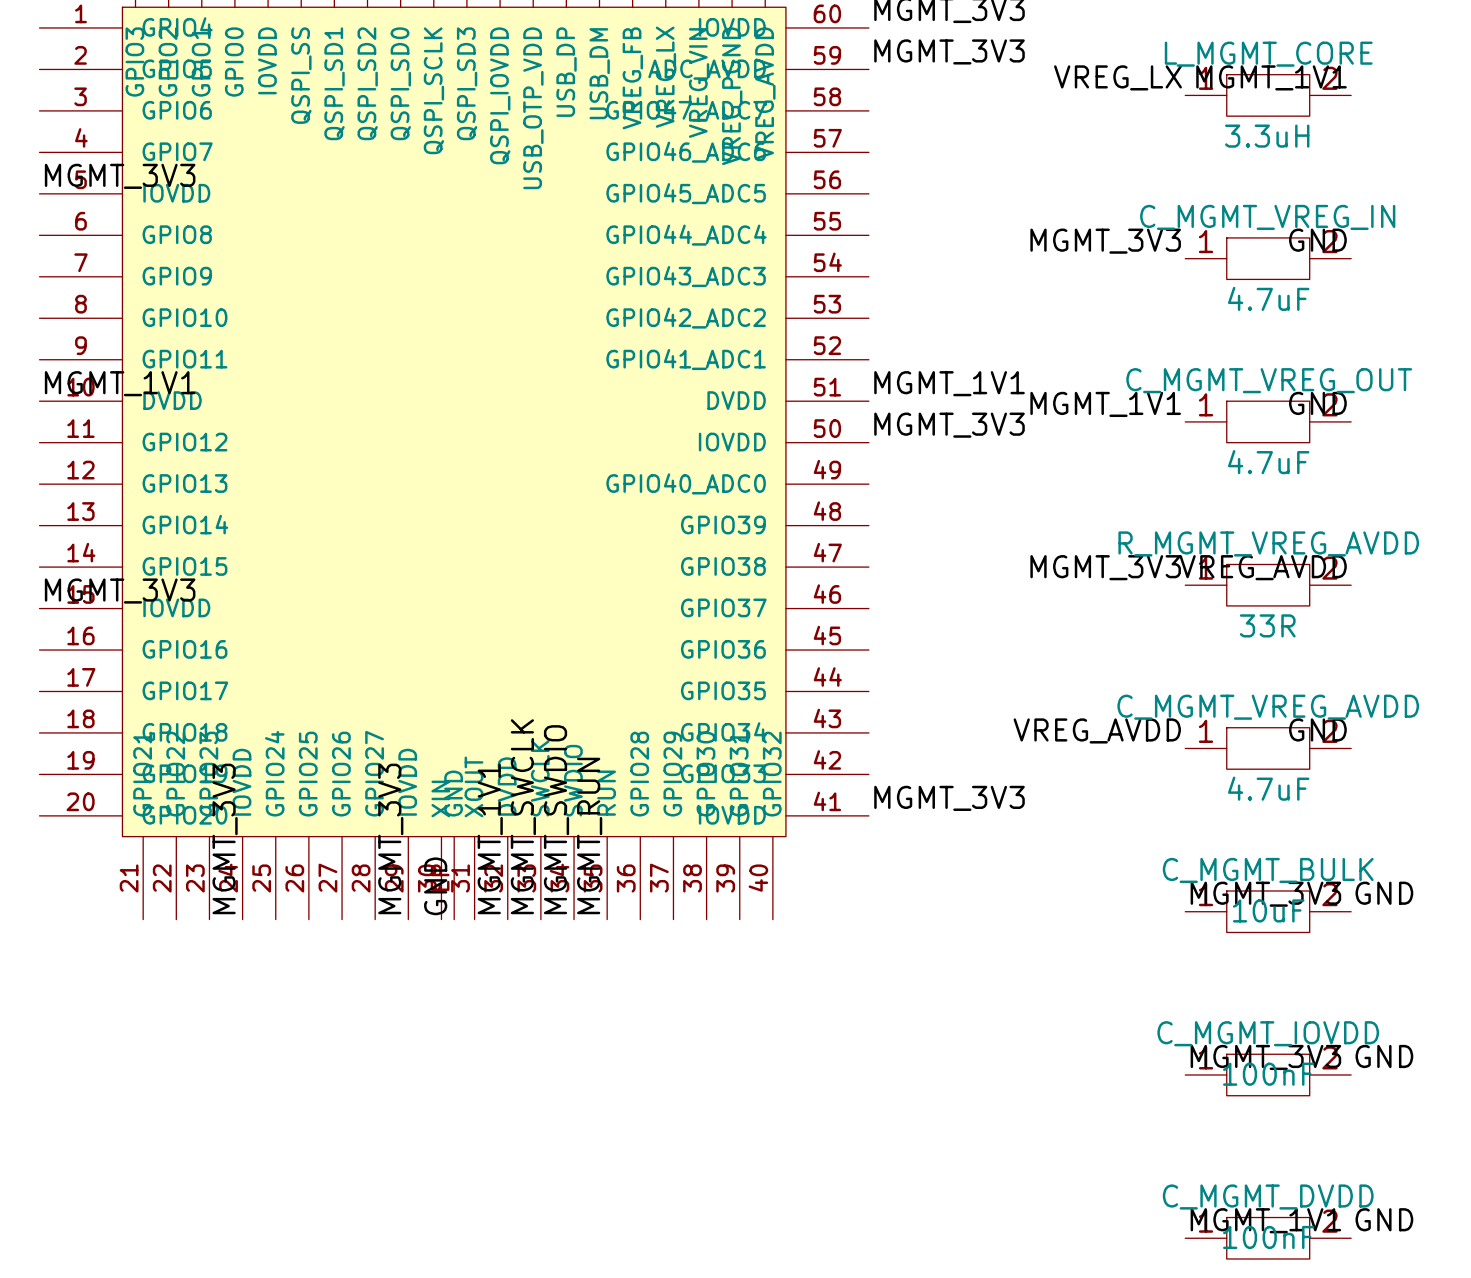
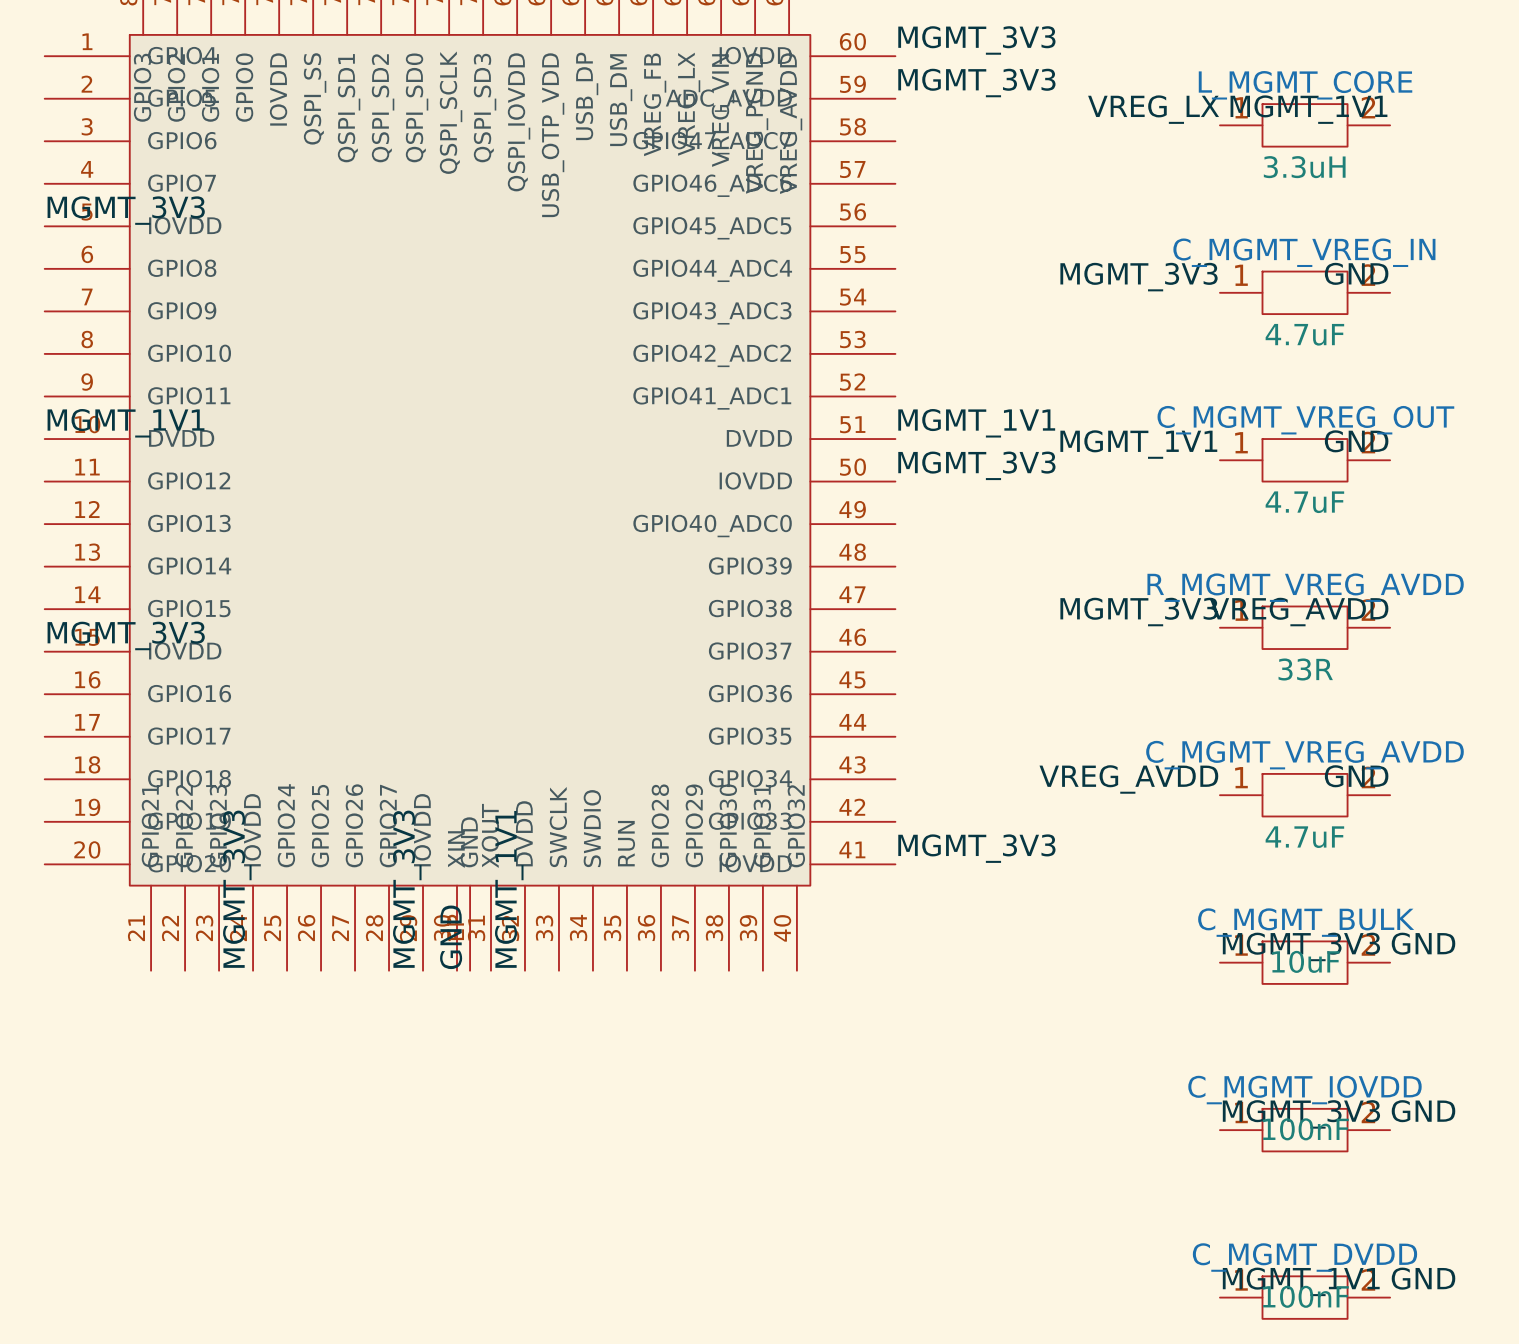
label: MGMT_SWCLK (523, 816) -> none
label: MGMT_SWDIO (556, 819) -> none
label: MGMT_RUN (589, 835) -> none

